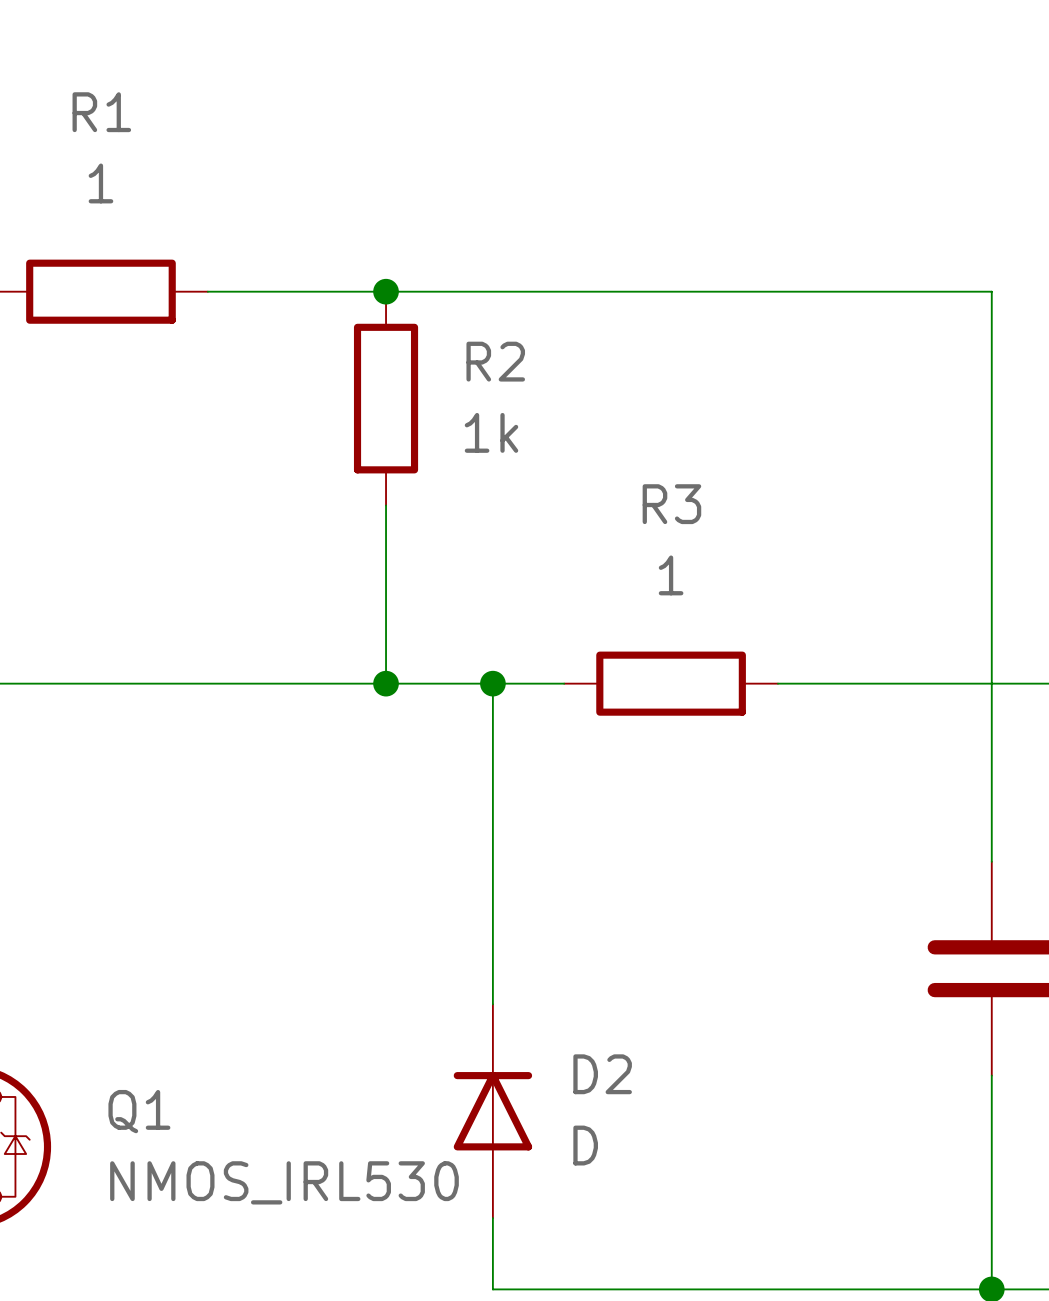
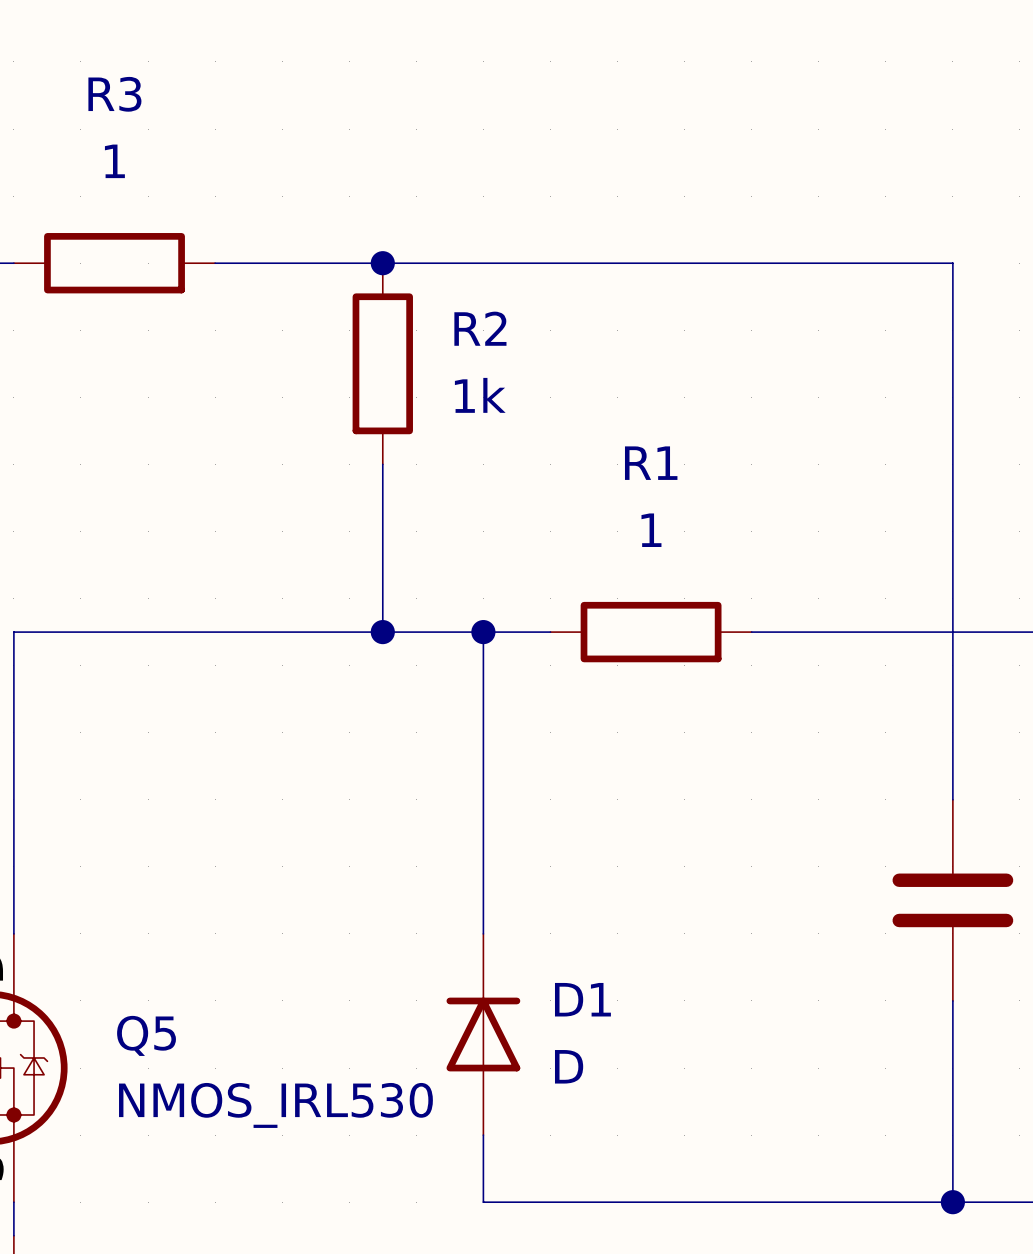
R1 name: R1 (101, 112) -> R3 (114, 94)
R3 name: R3 (671, 504) -> R1 (651, 463)
D2 name: D2 (602, 1074) -> D1 (582, 999)
Q1 name: Q1 (139, 1111) -> Q5 (146, 1035)

